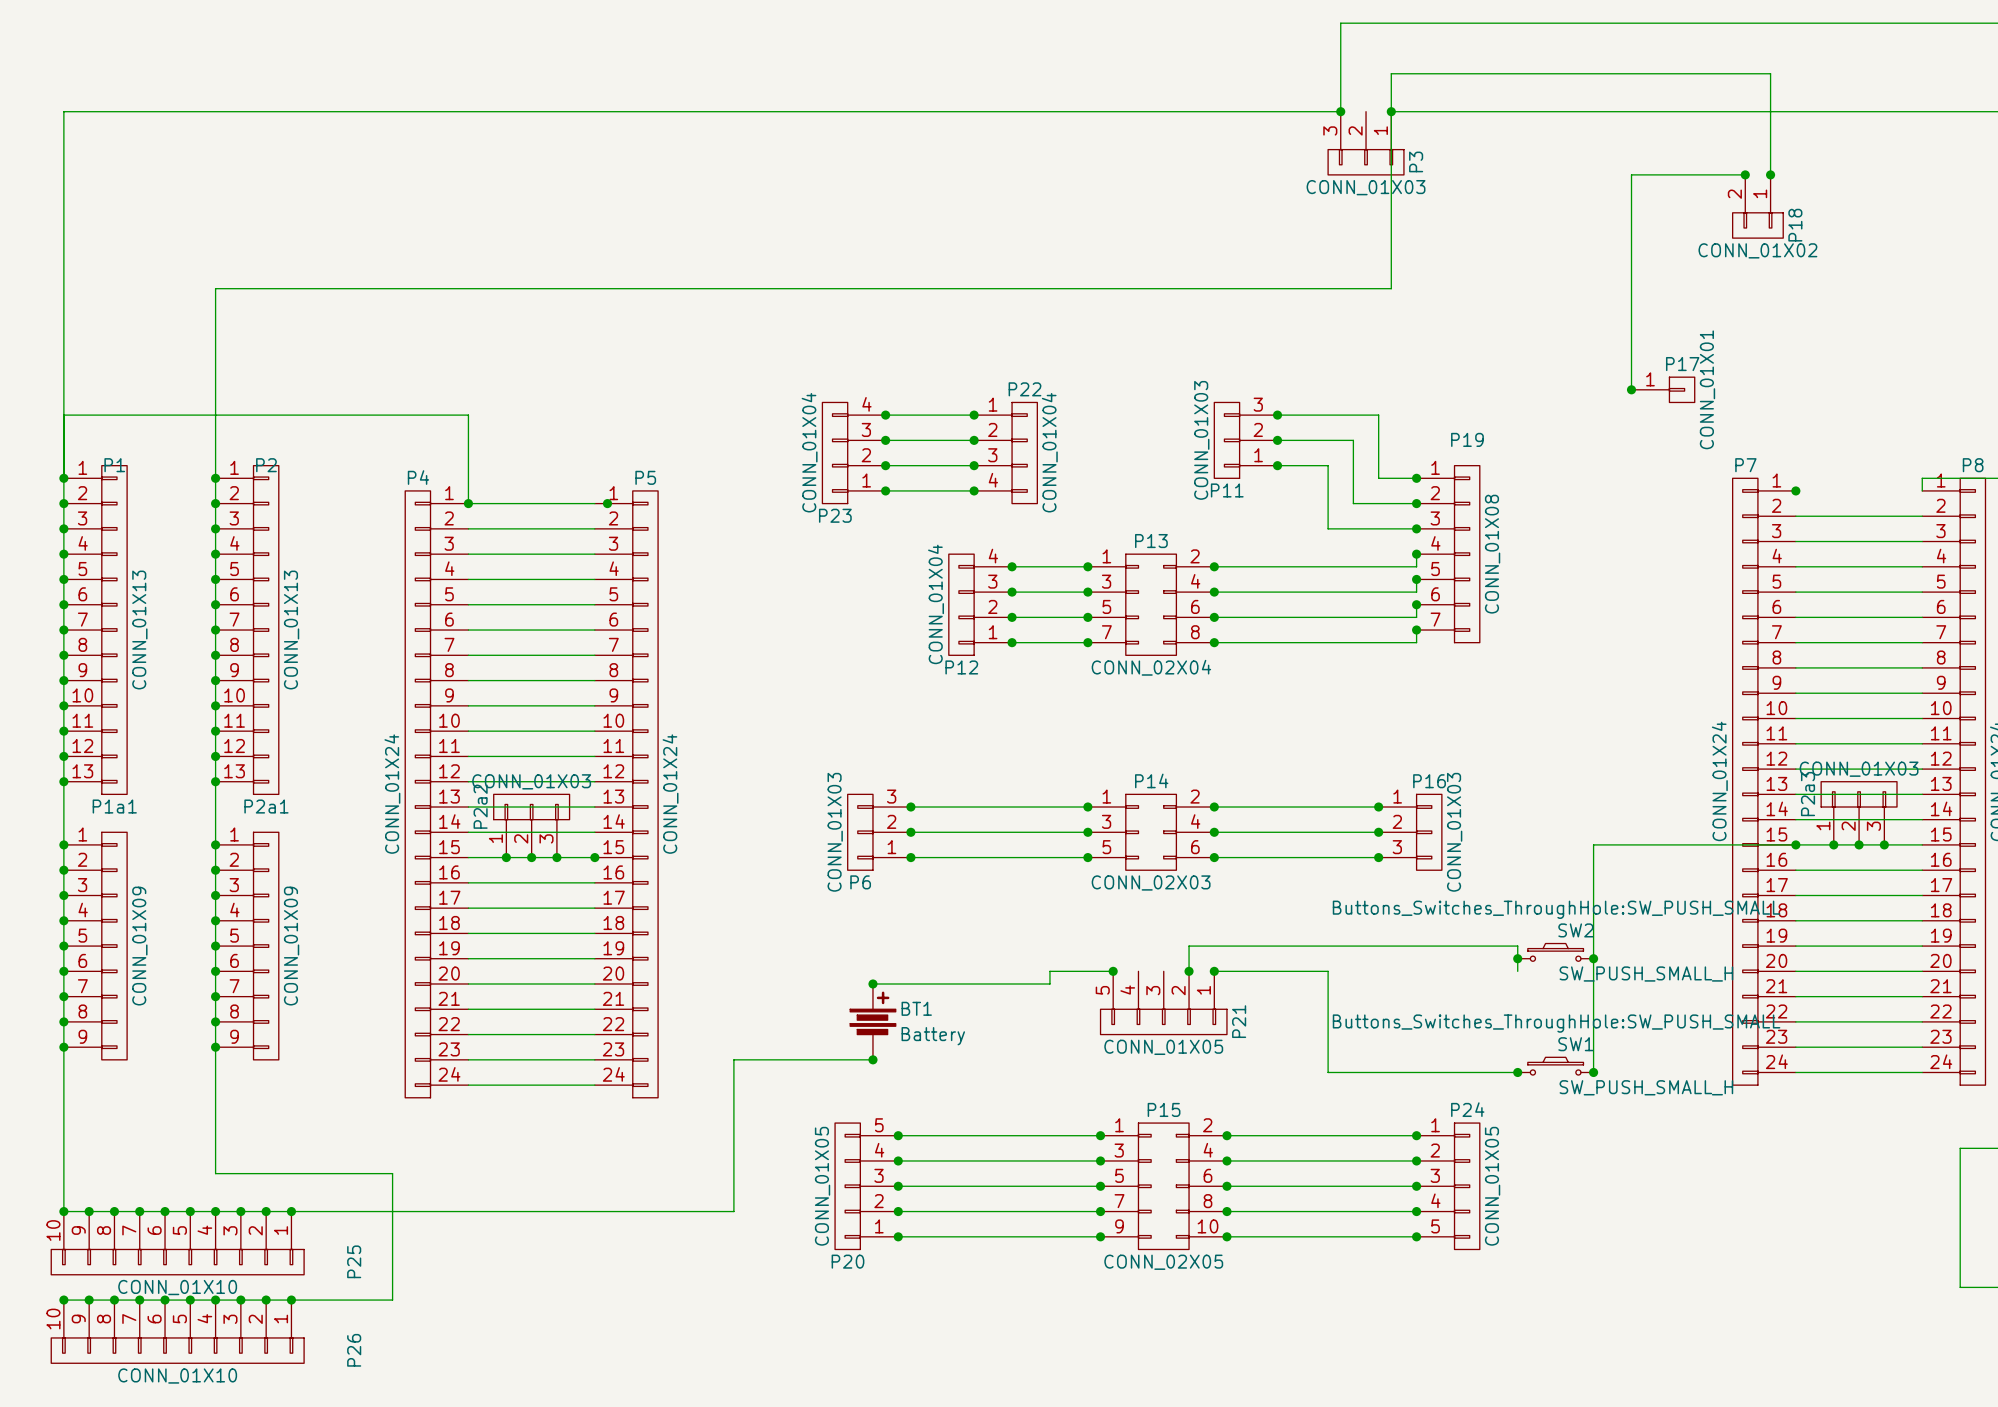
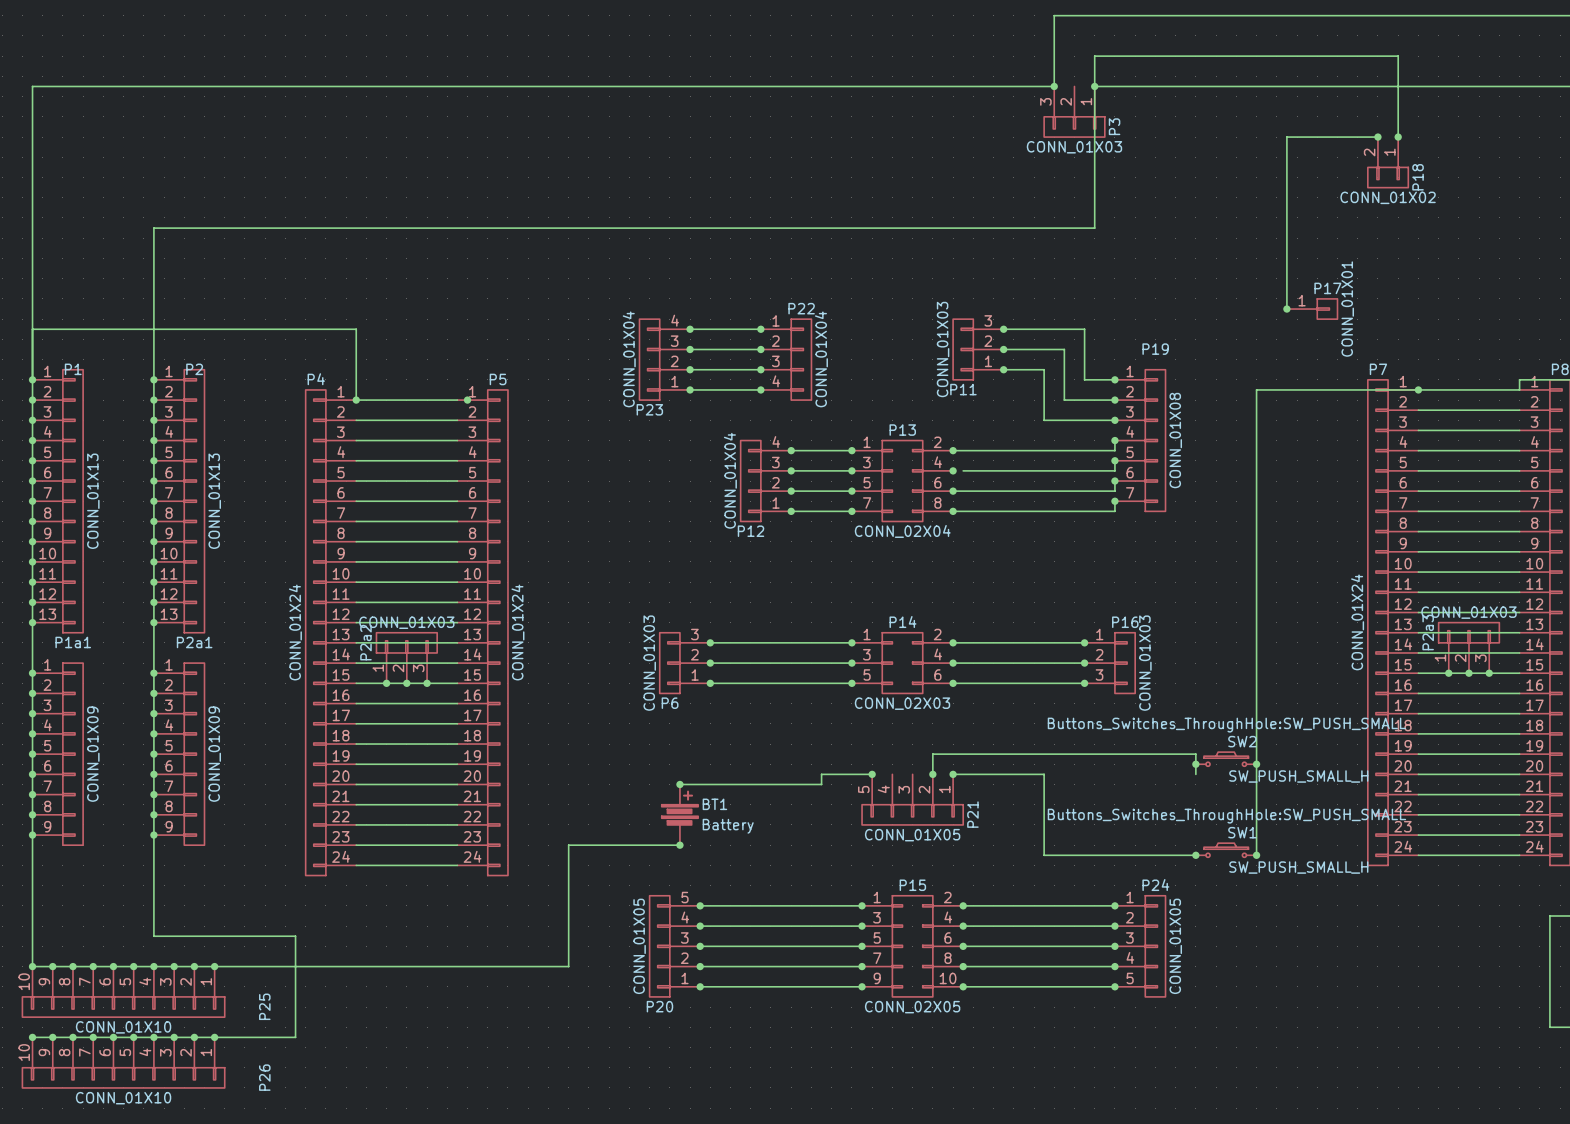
wire: (1214, 592) (1226, 592) -> none
wire: (1593, 844) (1795, 844) -> (1256, 673) (1256, 389) (1519, 389)
junction: (1795, 844) -> none
junction: (594, 857) -> none

